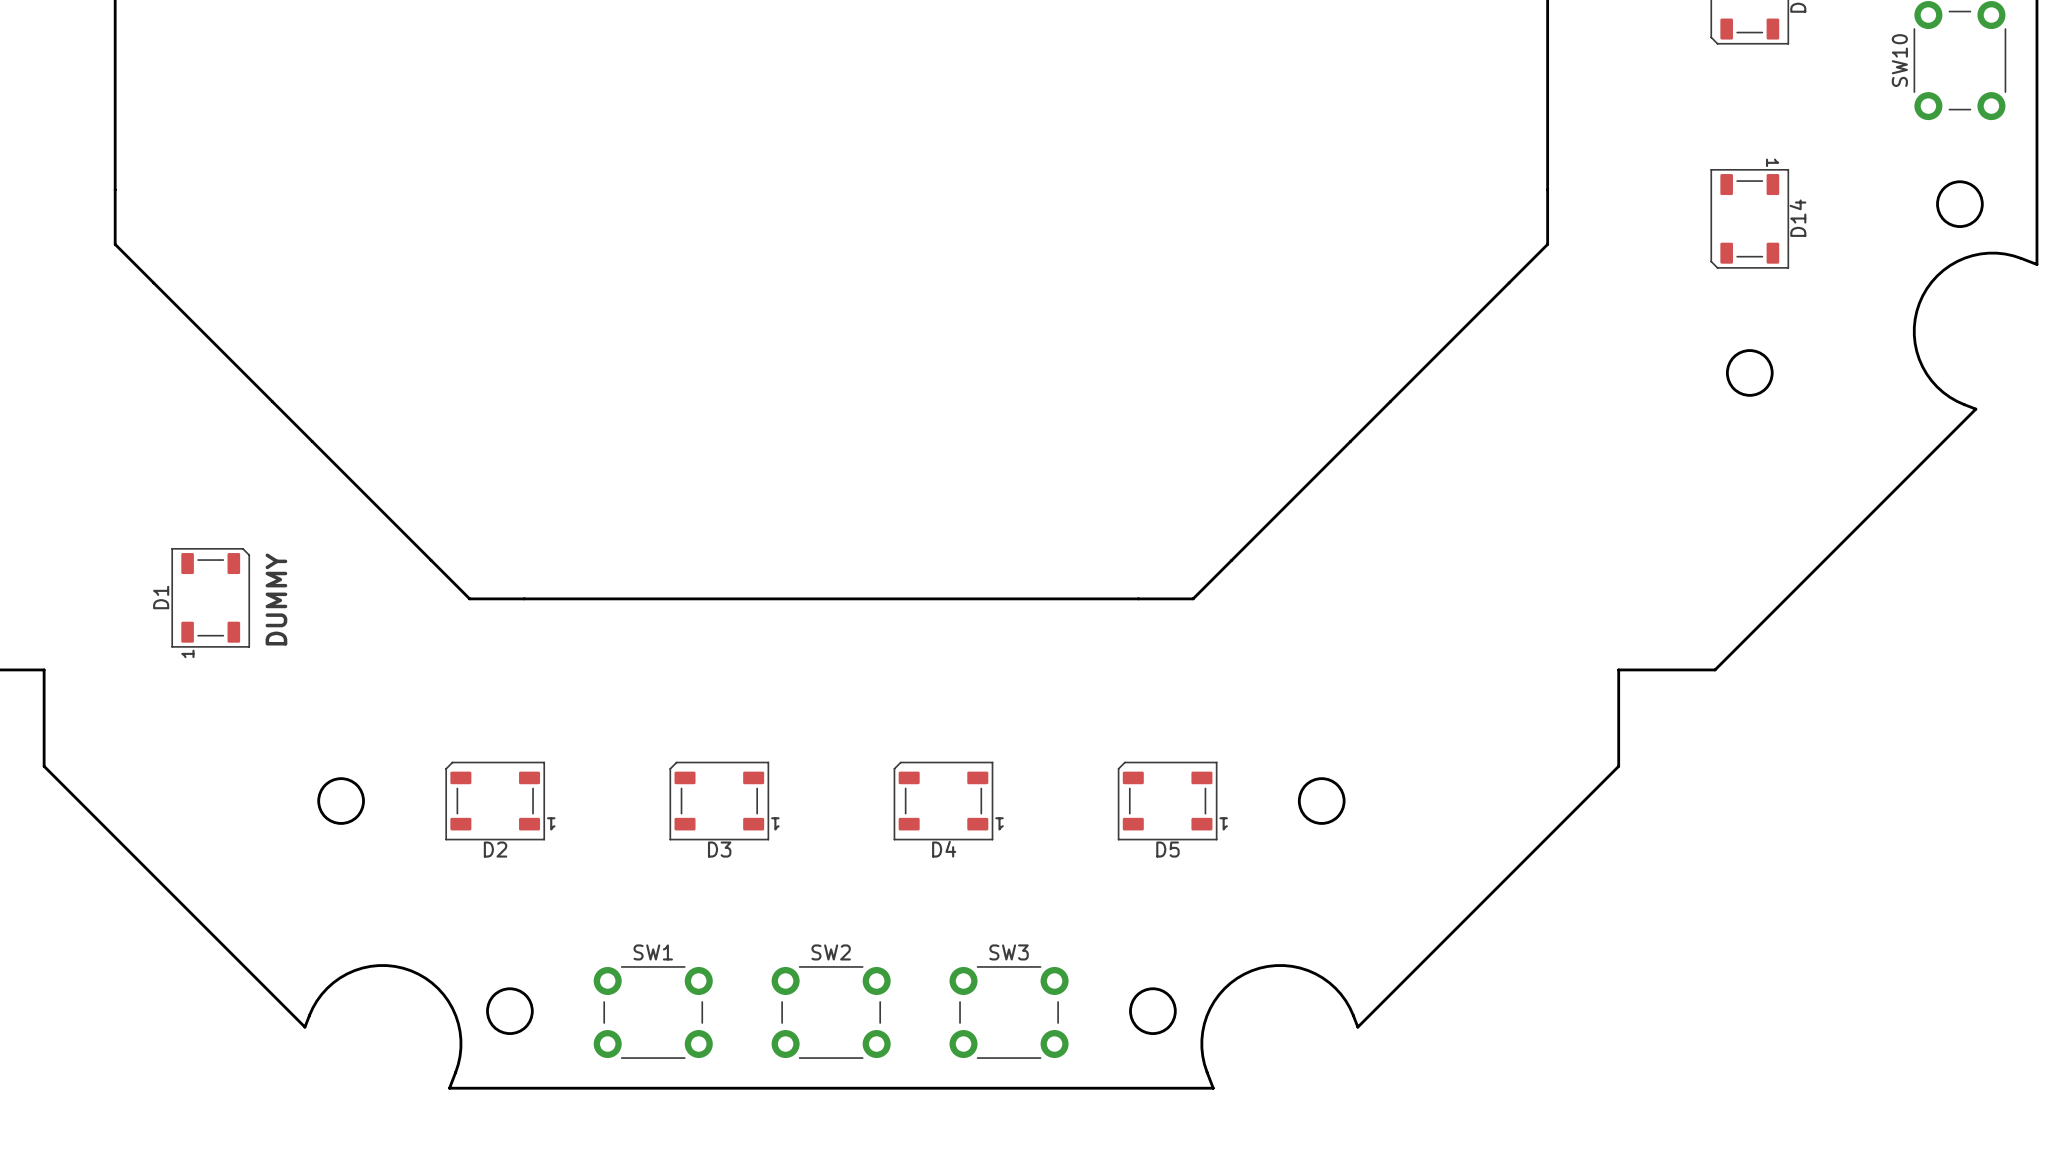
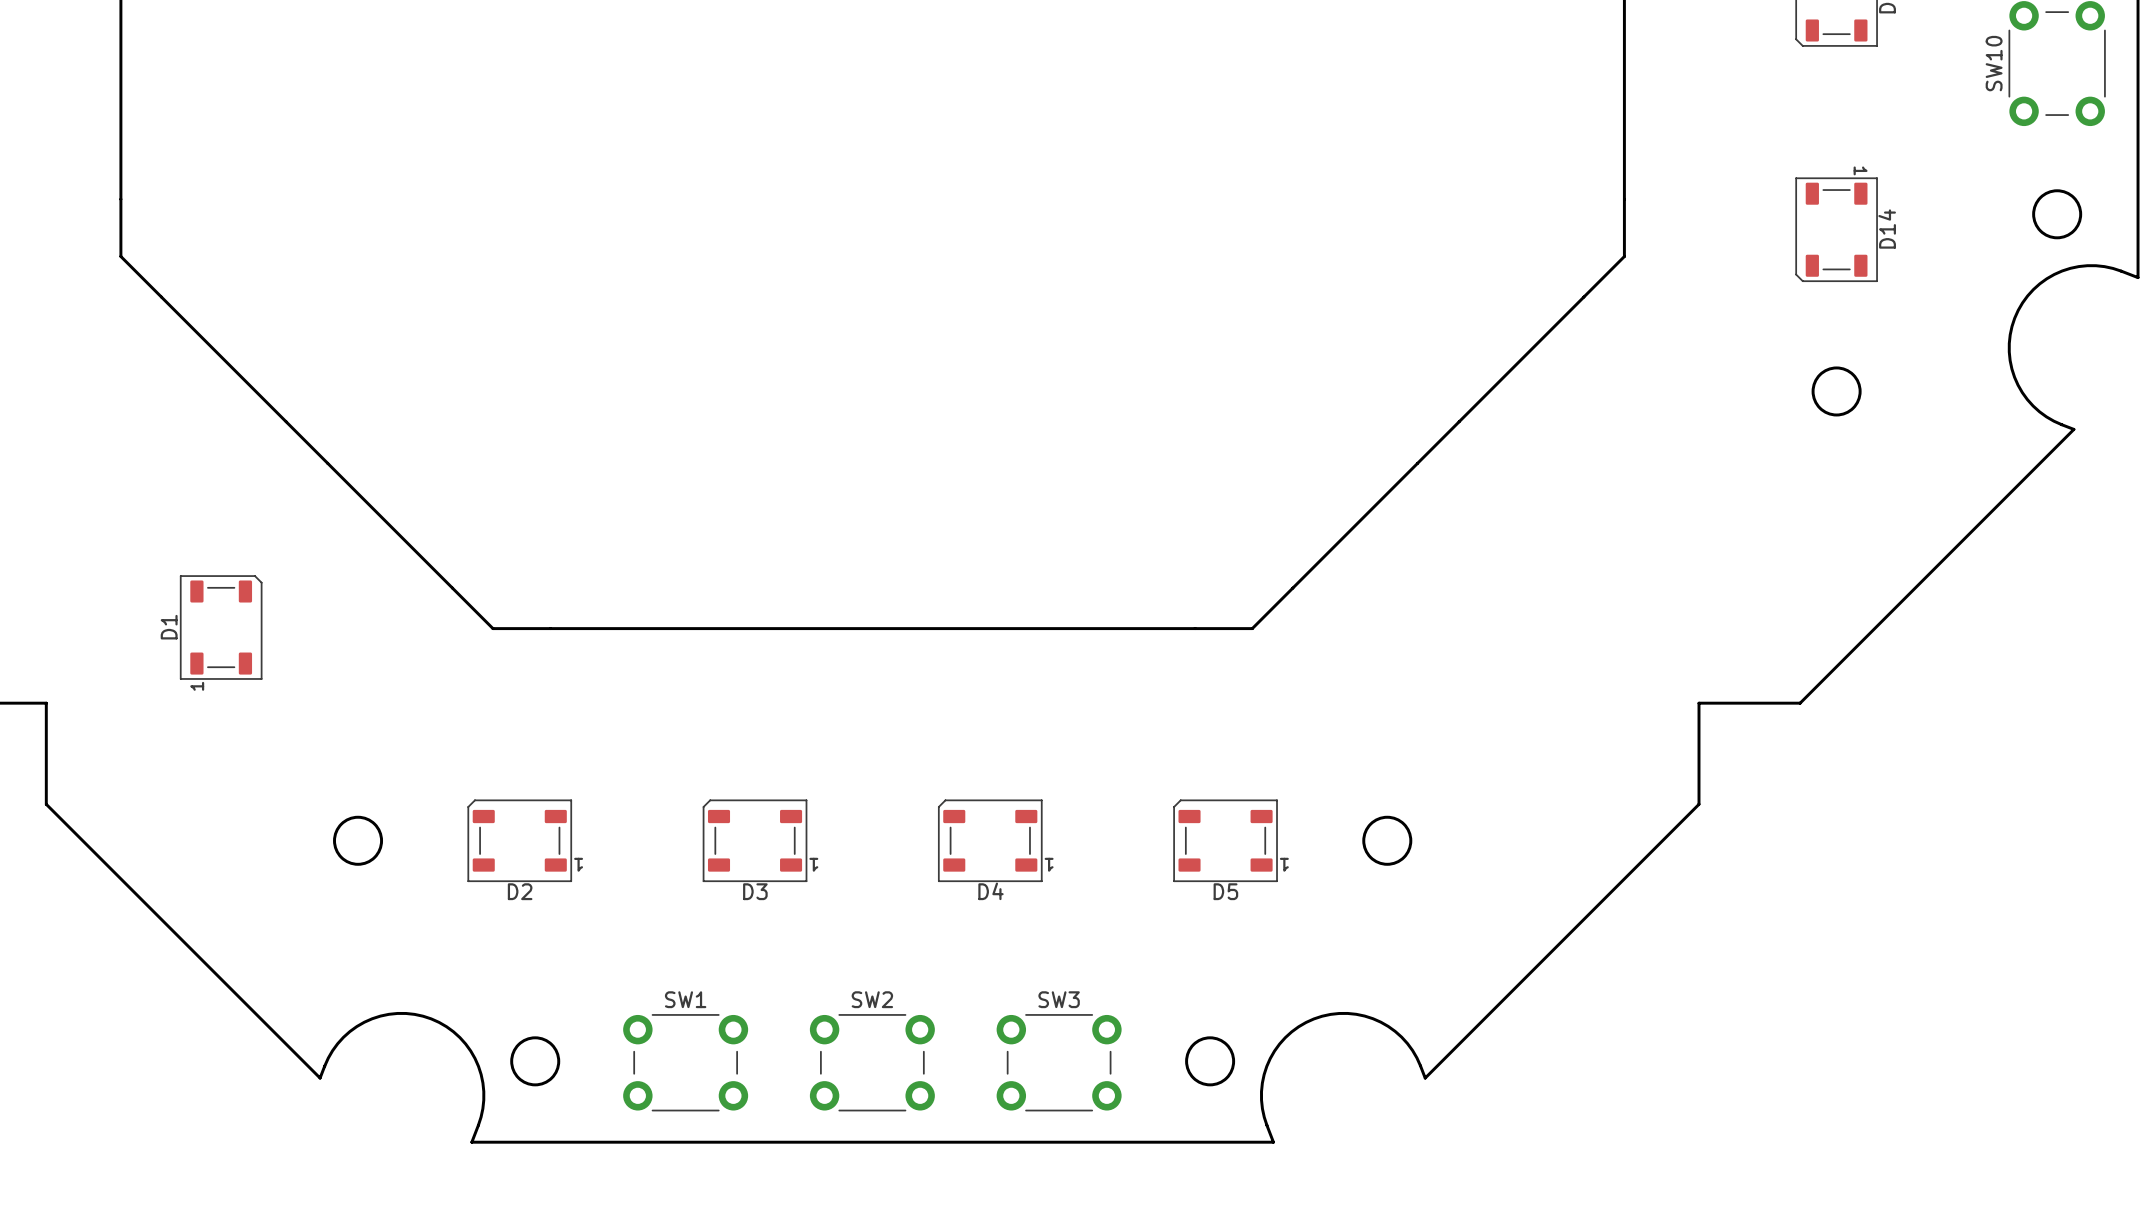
text: DUMMY (276, 599) -> none

